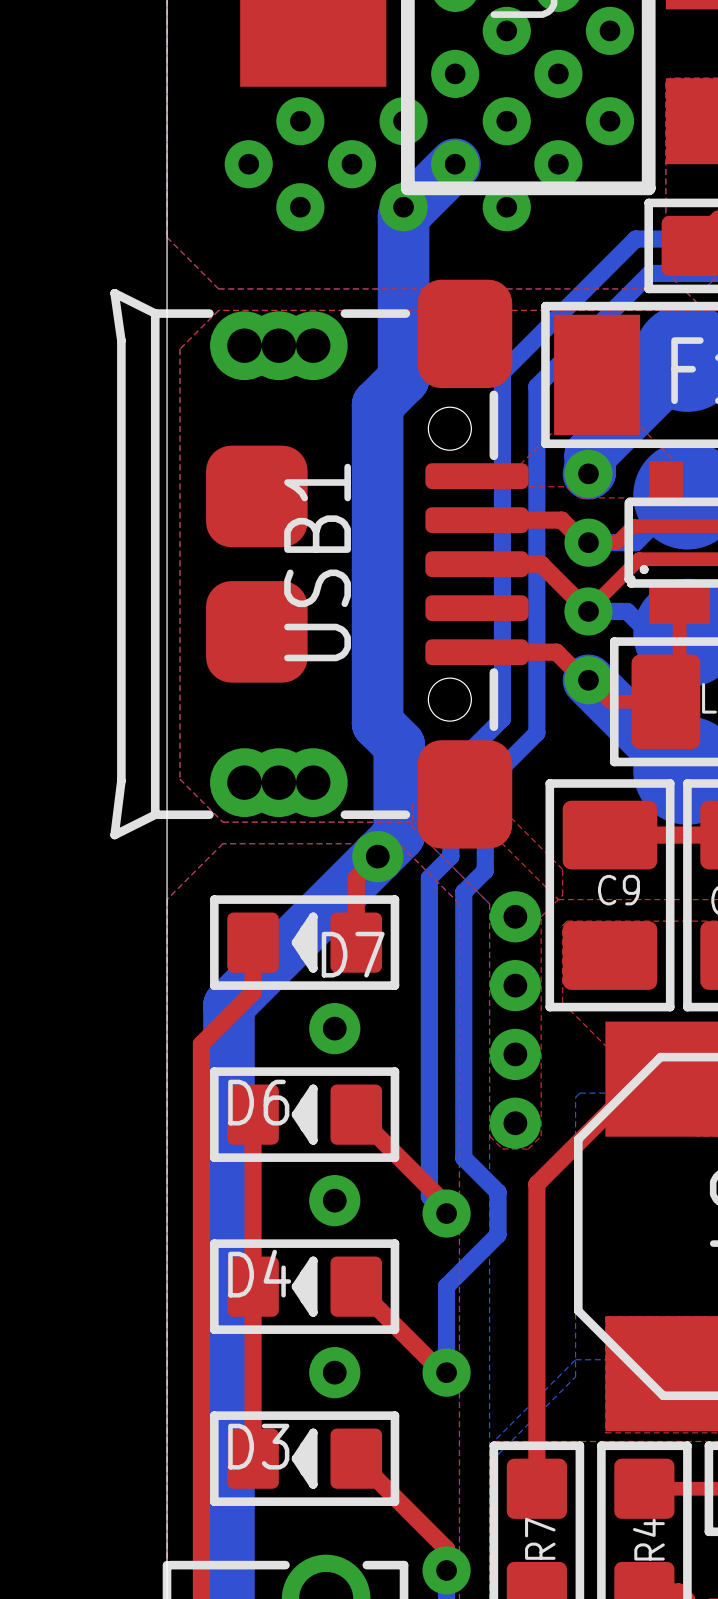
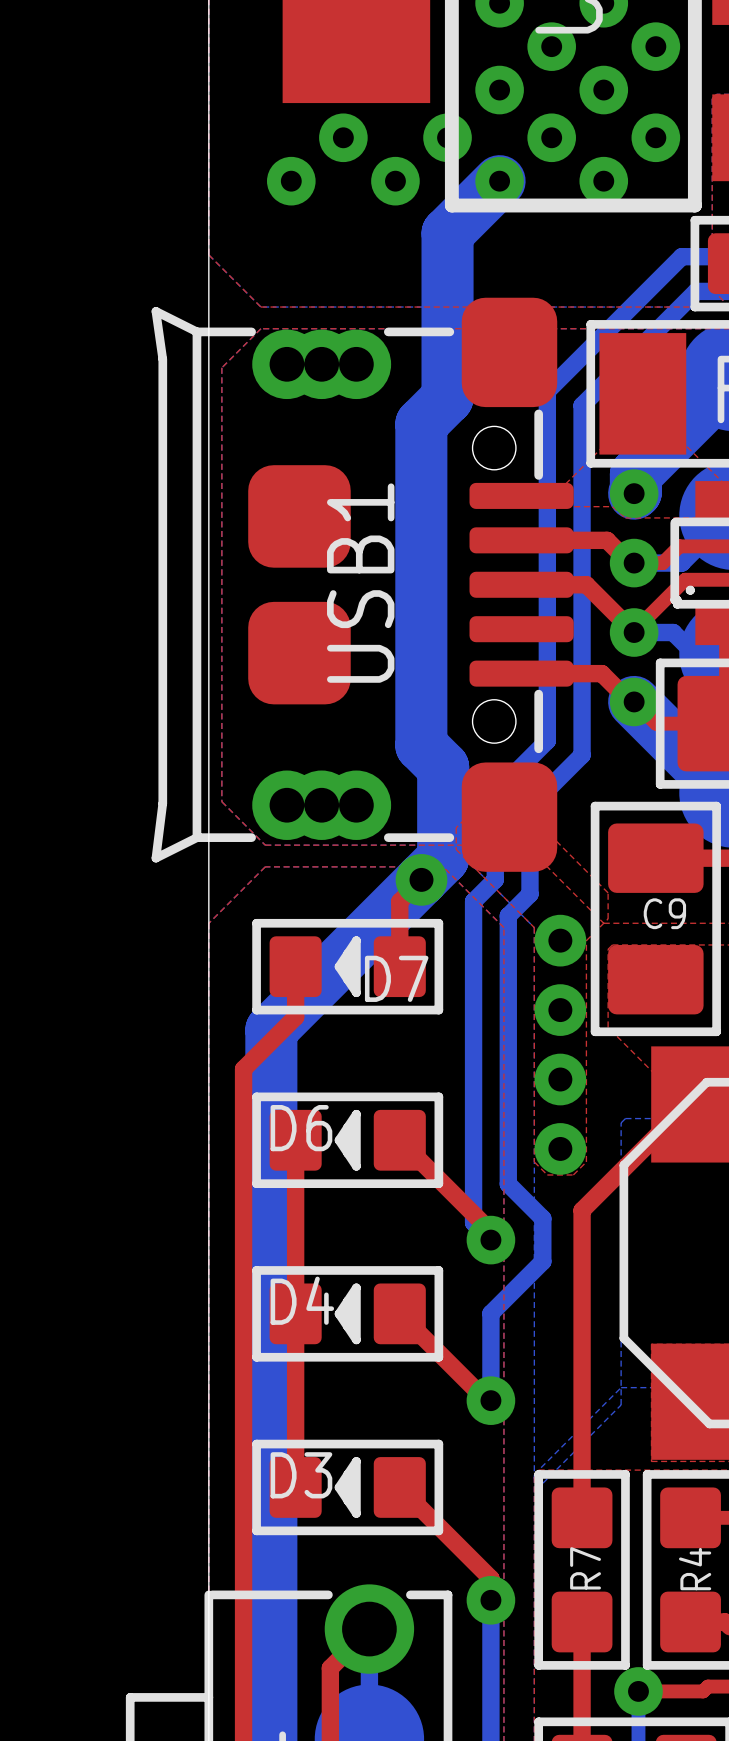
via: (300, 207) -> none
via: (403, 207) -> none
via: (506, 207) -> none
via: (334, 1028) -> none
via: (334, 1200) -> none
via: (334, 1372) -> none

